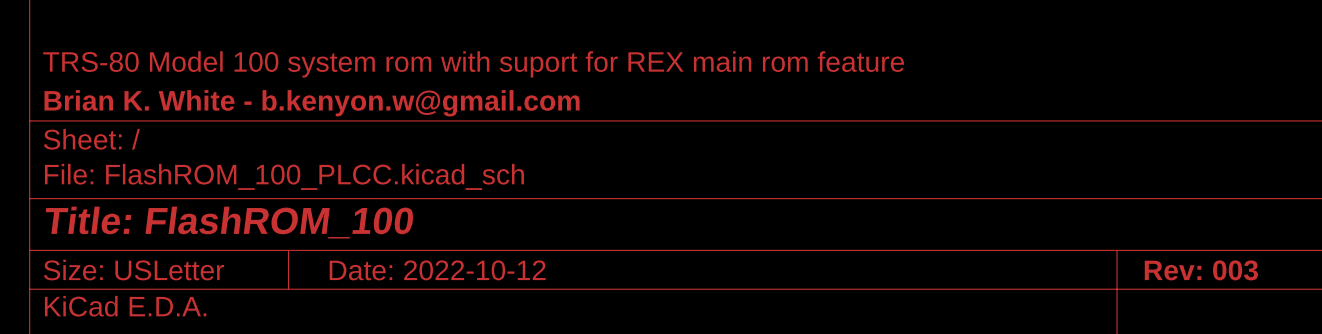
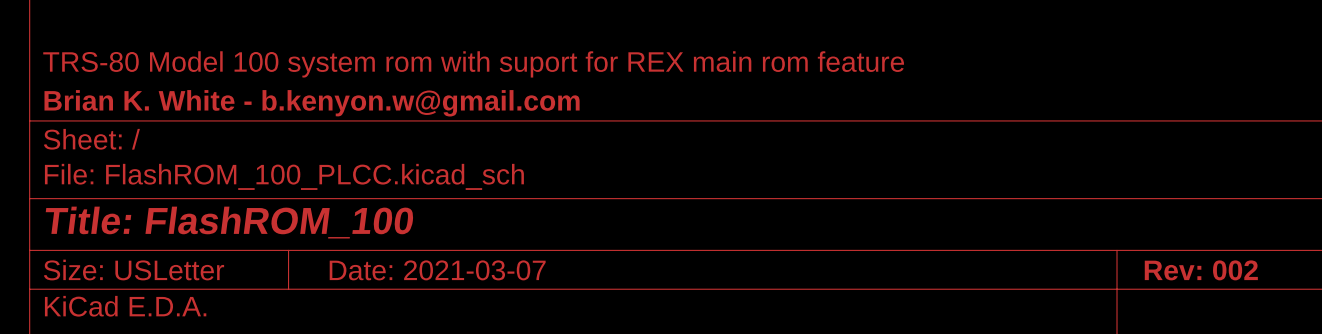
title block: Date: 2022-10-12 (437, 270) -> Date: 2021-03-07 (437, 270)
title block: Rev: 003 (1201, 270) -> Rev: 002 (1201, 270)

